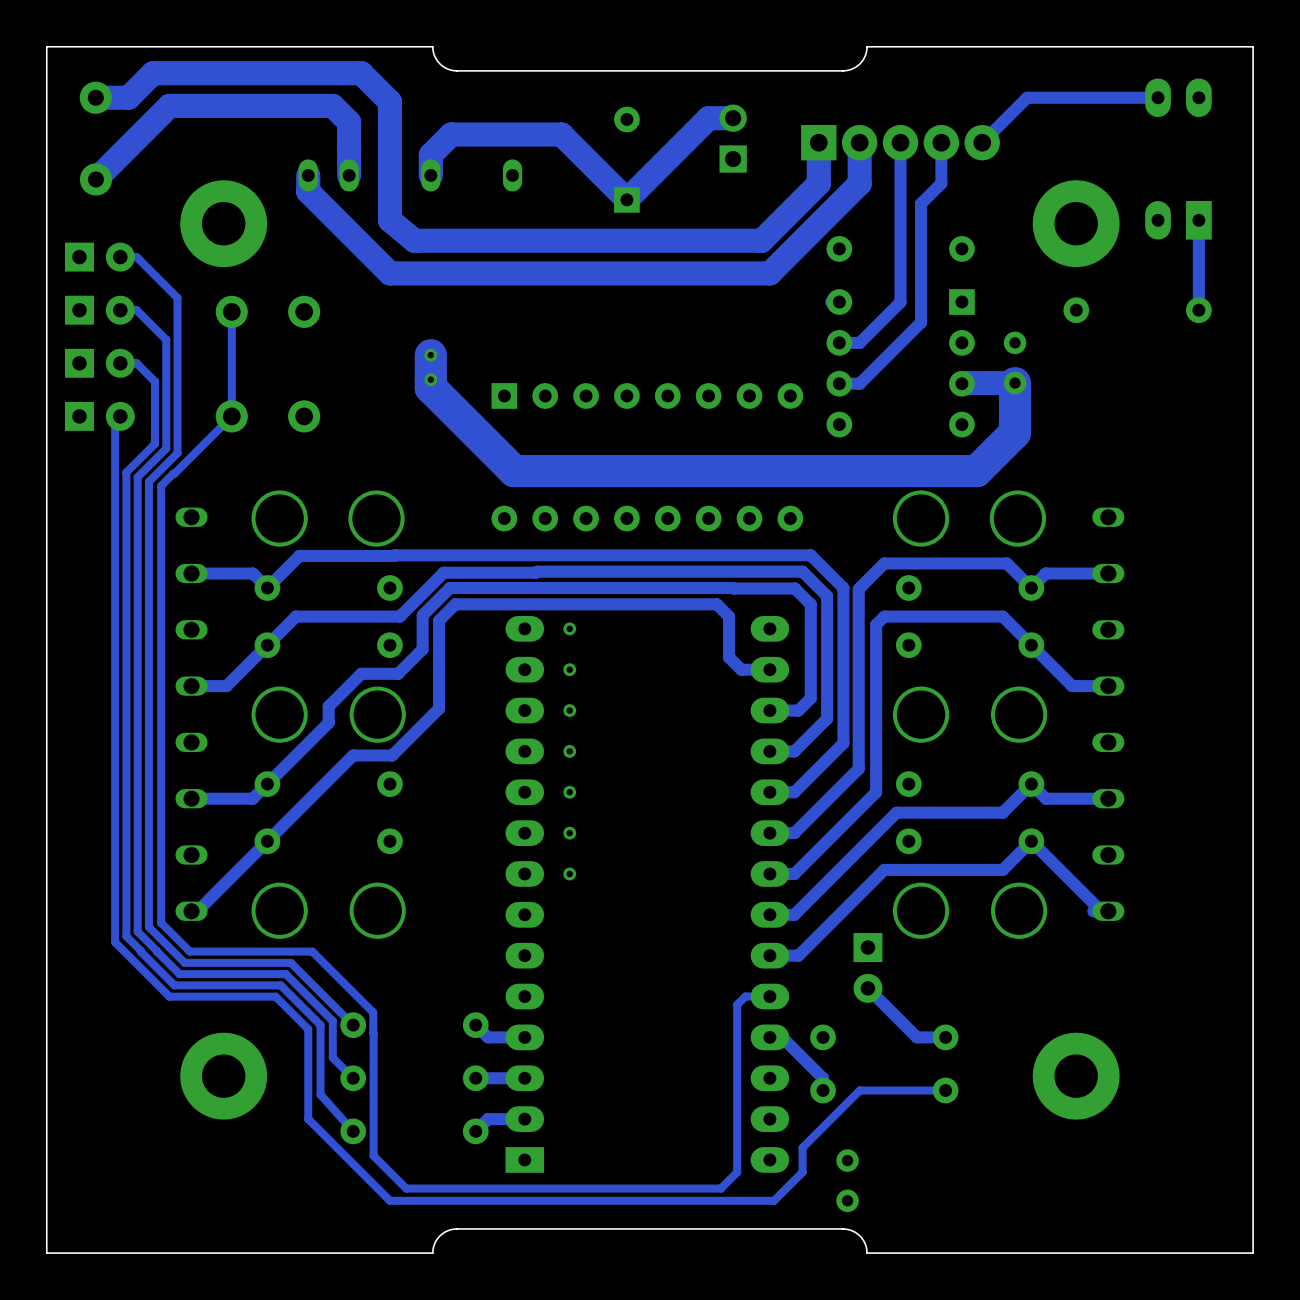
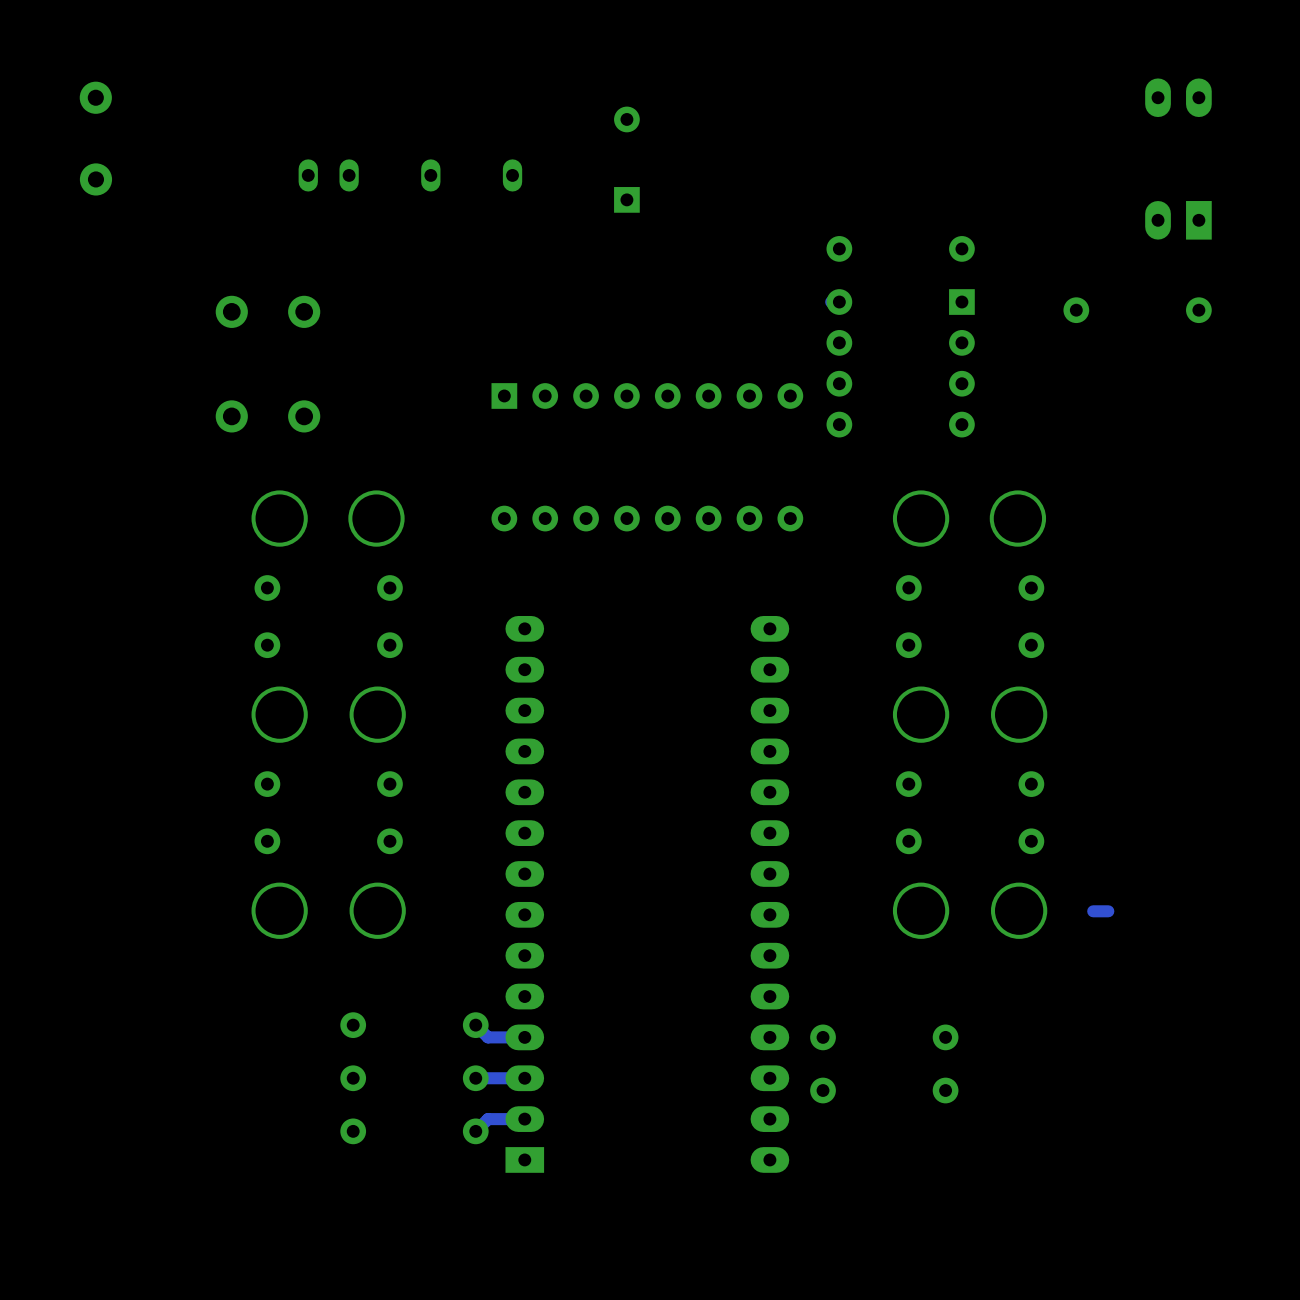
board edge: (1253, 46) (867, 46) (865, 55) (859, 63) (852, 69) (842, 70) (456, 70) (447, 69) (439, 63) (434, 55) (432, 46) (46, 46) (46, 1253) (432, 1253) (434, 1243) (439, 1236) (447, 1230) (456, 1228) (842, 1228) (852, 1230) (859, 1236) (865, 1243) (867, 1253) (1253, 1253) (1253, 46) -> none
track: (95, 97) (128, 97) (153, 73) (361, 73) (389, 101) (389, 220) (414, 240) (761, 240) (818, 183) (818, 142) -> none
track: (1158, 97) (1027, 97) (982, 142) -> none
track: (733, 118) (708, 118) (626, 199) (561, 134) (451, 134) (430, 154) (430, 175) -> none
part: (733, 138) -> none
track: (859, 142) (859, 183) (769, 273) (389, 273) (308, 191) (308, 175) -> none
track: (900, 142) (900, 302) (859, 342) (839, 342) -> none
part: (900, 142) -> none
track: (941, 142) (941, 183) (921, 203) (921, 322) (859, 383) (839, 383) -> none
track: (349, 175) (349, 122) (332, 105) (169, 105) (95, 179) -> none
track: (1198, 220) (1198, 310) -> none
part: (223, 223) -> none
part: (1076, 223) -> none
part: (99, 257) -> none
track: (120, 257) (136, 257) (177, 297) (177, 453) (148, 481) (148, 927) (184, 962) (290, 962) (353, 1025) -> none
track: (231, 307) (231, 416) (161, 485) (161, 923) (189, 951) (312, 951) (373, 1012) (373, 1155) (406, 1188) (720, 1188) (737, 1172) (737, 1004) (745, 996) (769, 996) -> none
part: (99, 310) -> none
track: (120, 310) (136, 310) (166, 339) (166, 448) (137, 477) (137, 931) (179, 974) (285, 974) (332, 1021) (332, 1057) (353, 1078) -> none
track: (430, 355) (430, 387) (514, 471) (976, 471) (1015, 432) (1015, 383) (961, 383) -> none
via: (430, 355) -> none
part: (1015, 362) -> none
part: (99, 363) -> none
track: (120, 363) (136, 363) (155, 381) (155, 443) (126, 472) (126, 936) (174, 985) (280, 985) (320, 1025) (320, 1094) (353, 1131) -> none
via: (430, 379) -> none
part: (99, 416) -> none
track: (120, 416) (115, 421) (115, 942) (169, 996) (275, 996) (308, 1029) (308, 1119) (389, 1200) (774, 1200) (802, 1172) (802, 1147) (859, 1090) (945, 1090) -> none
track: (191, 573) (252, 573) (267, 588) (299, 555) (810, 555) (843, 588) (843, 743) (794, 792) (769, 792) -> none
track: (1108, 573) (1045, 573) (1031, 588) (1006, 563) (884, 563) (858, 589) (858, 768) (794, 833) (769, 833) -> none
via: (569, 628) -> none
via: (569, 669) -> none
track: (769, 669) (741, 669) (729, 657) (729, 616) (716, 604) (455, 604) (438, 620) (438, 708) (392, 755) (353, 755) (197, 911) (191, 911) -> none
track: (191, 686) (226, 686) (296, 616) (399, 616) (443, 572) (802, 571) (827, 596) (827, 718) (794, 751) (769, 751) -> none
track: (1108, 686) (1072, 686) (1002, 616) (884, 616) (876, 624) (876, 792) (794, 873) (769, 873) -> none
via: (569, 710) -> none
track: (769, 710) (798, 710) (810, 698) (810, 604) (794, 588) (450, 588) (422, 615) (422, 649) (398, 673) (361, 673) (328, 706) (328, 722) (252, 798) (191, 798) -> none
part: (191, 714) -> none
part: (1108, 714) -> none
via: (569, 751) -> none
via: (569, 792) -> none
track: (1108, 798) (1045, 798) (1031, 784) (1002, 812) (896, 812) (794, 914) (769, 914) -> none
via: (569, 833) -> none
via: (569, 873) -> none
track: (1101, 911) (1031, 841) (1002, 869) (884, 869) (798, 955) (769, 955) -> none
part: (867, 967) -> none
track: (867, 988) (916, 1037) (945, 1037) -> none
track: (769, 1037) (782, 1037) (823, 1078) (823, 1090) -> none
part: (223, 1076) -> none
part: (1076, 1076) -> none
part: (847, 1180) -> none

